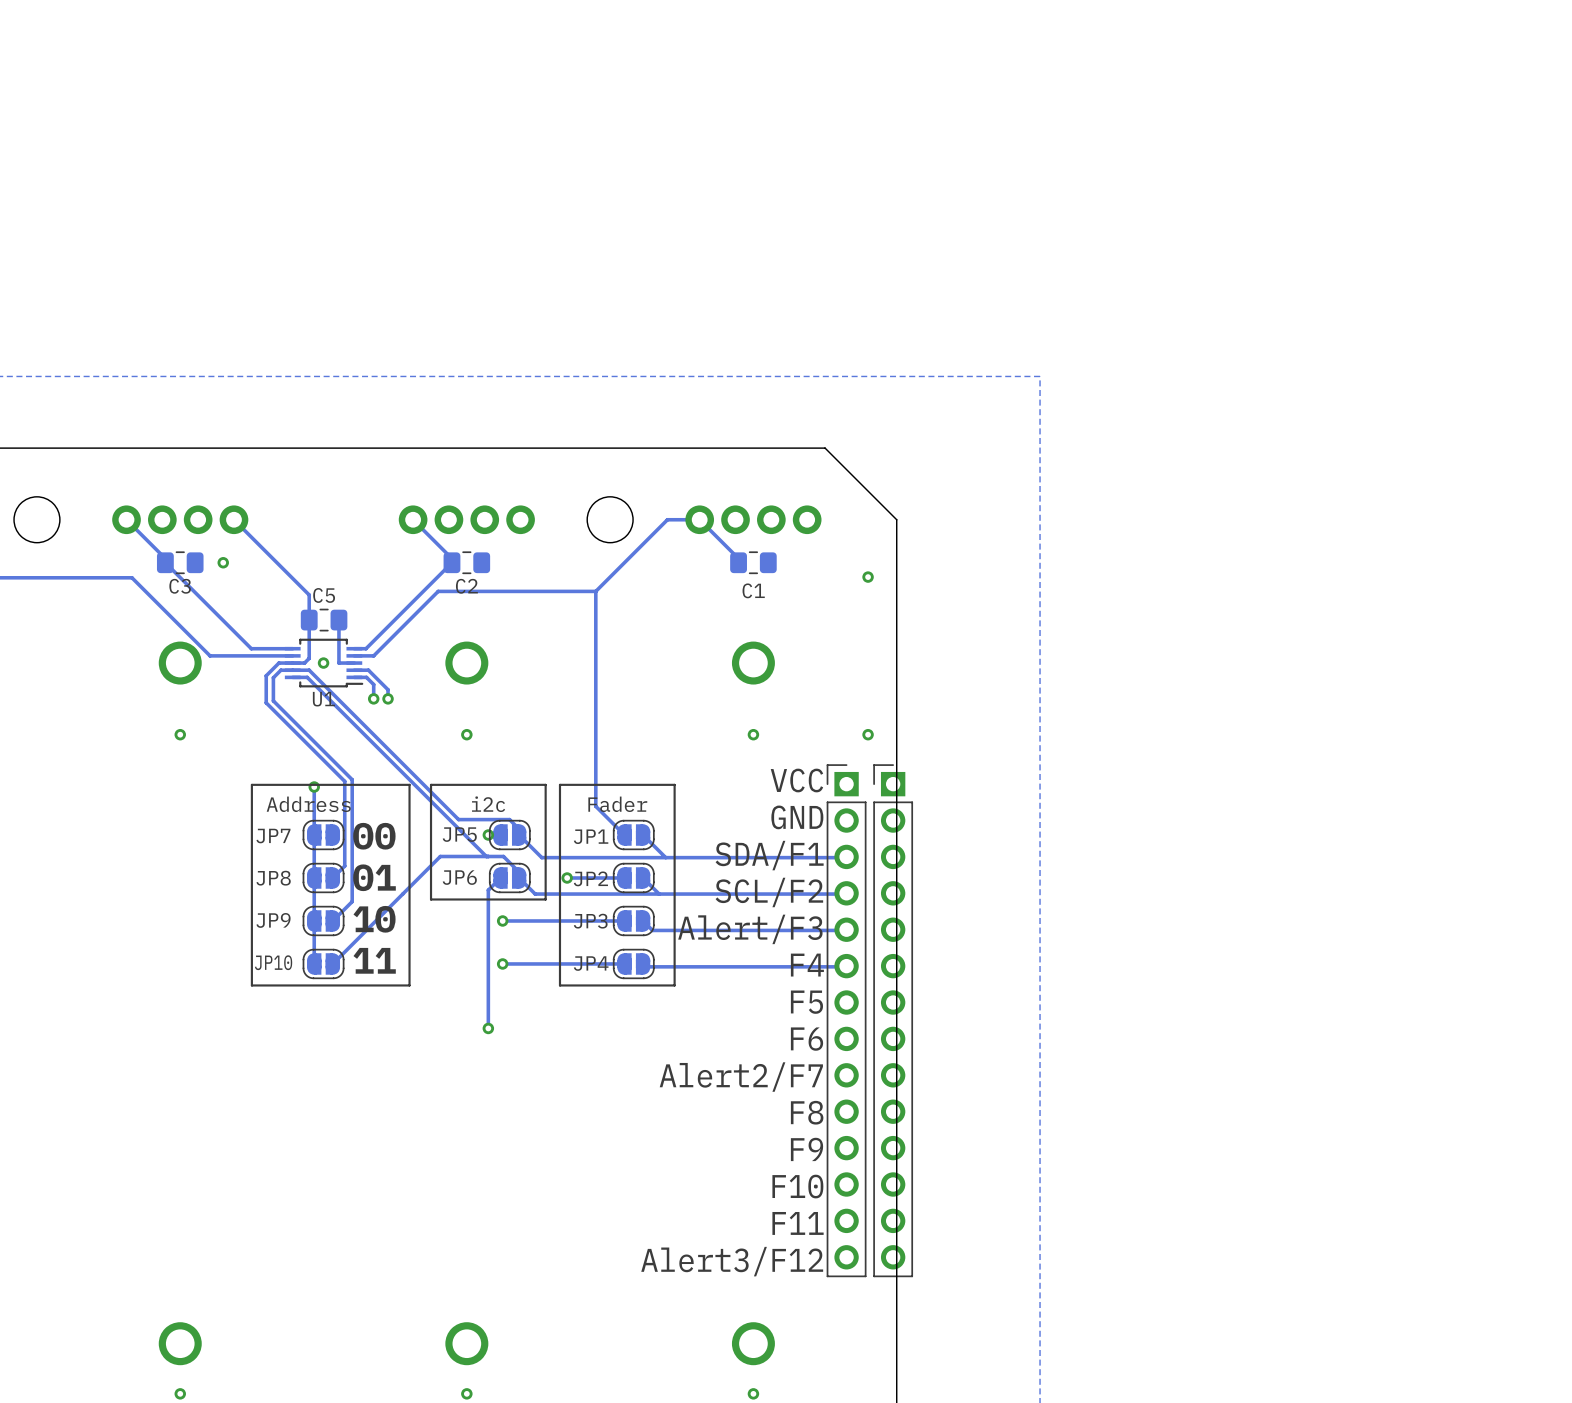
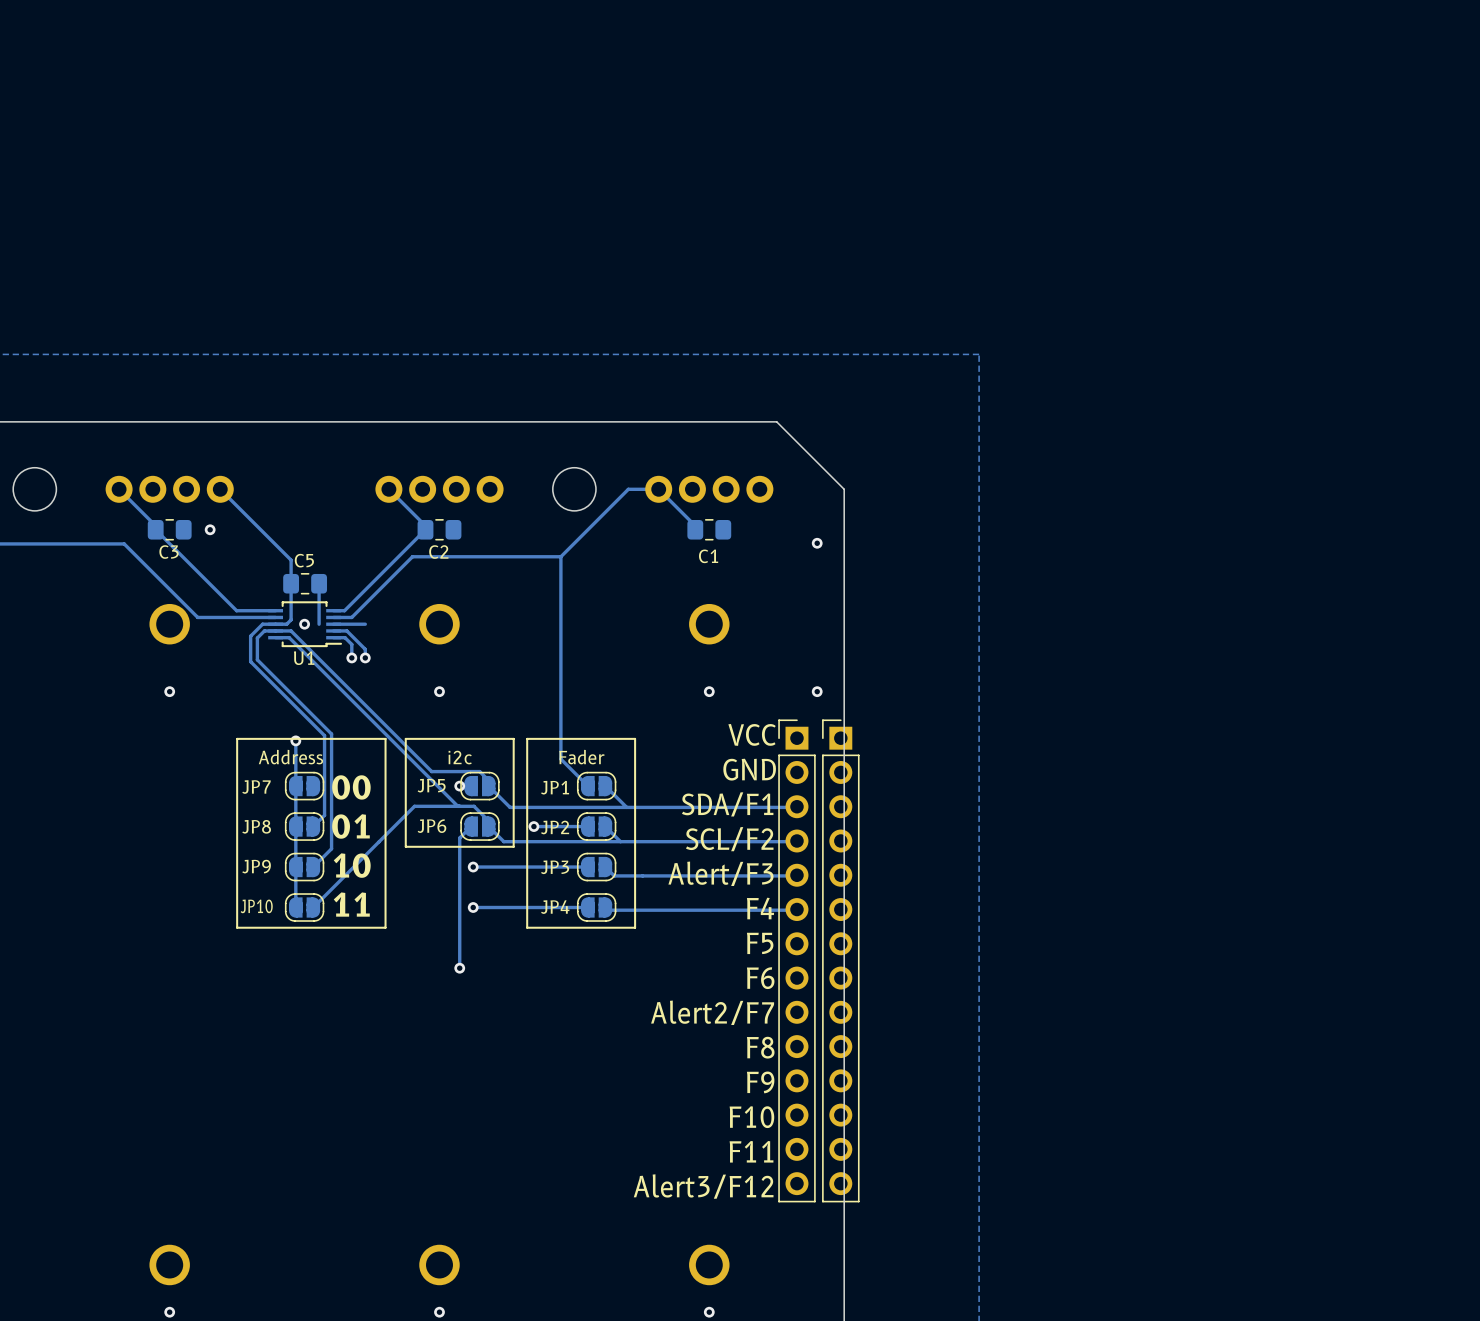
track: (354, 663) (338, 663) -> (333, 624) (365, 624)

